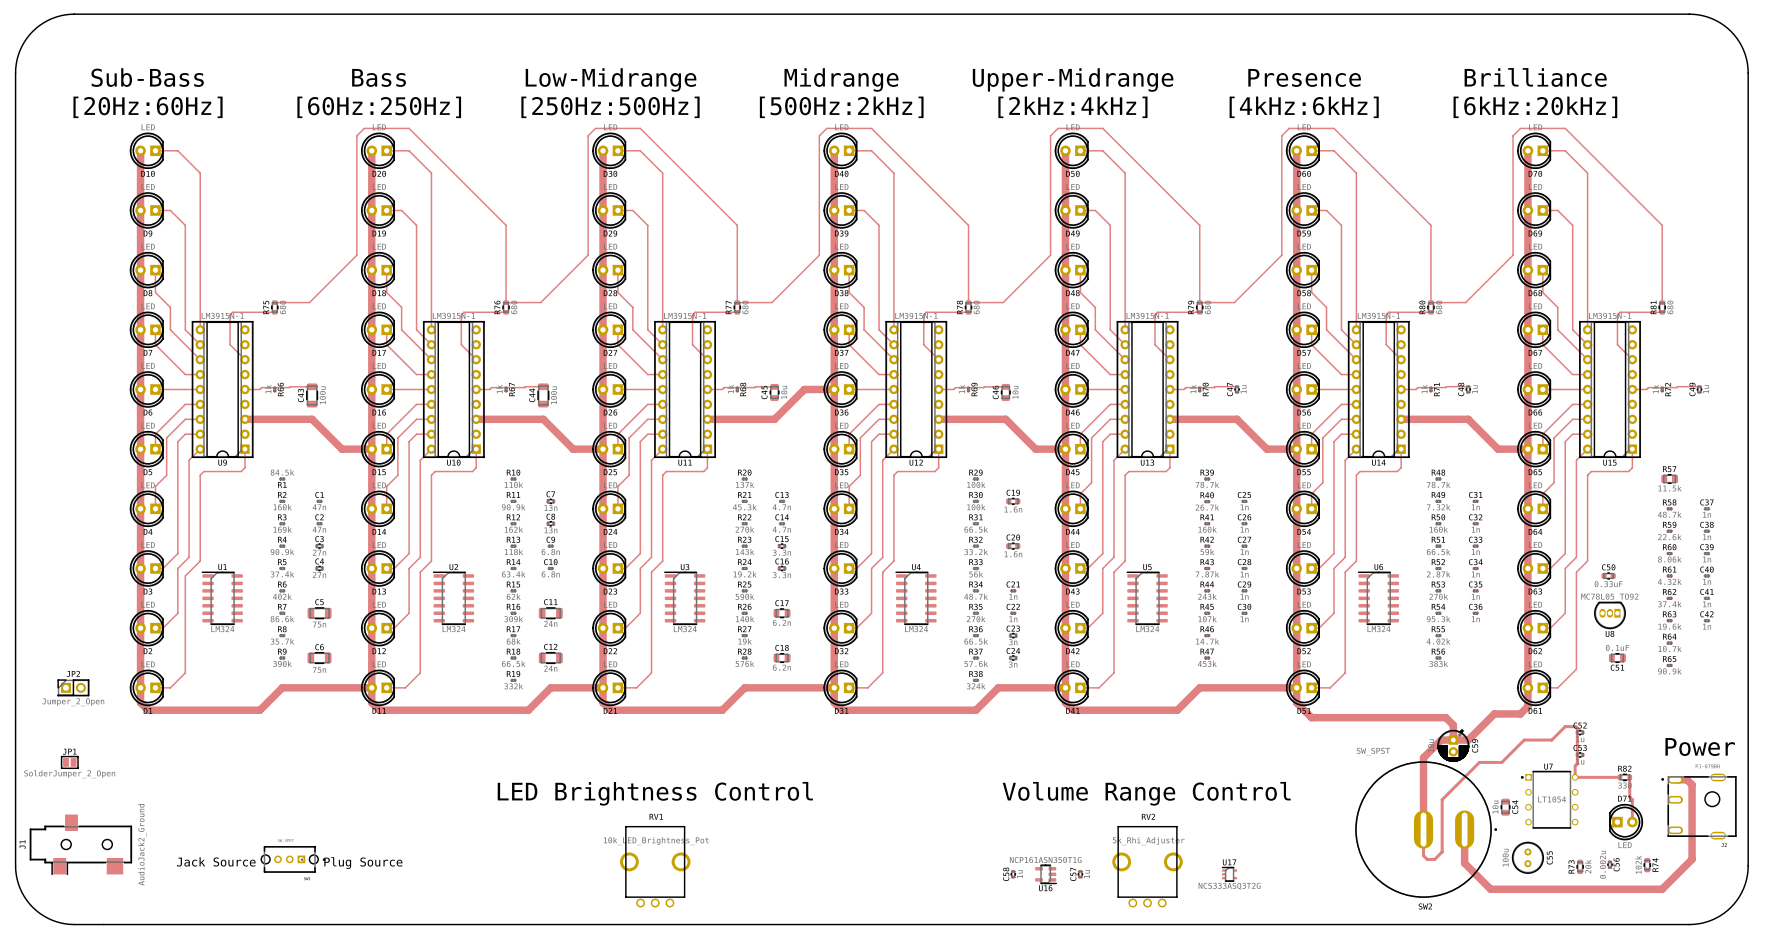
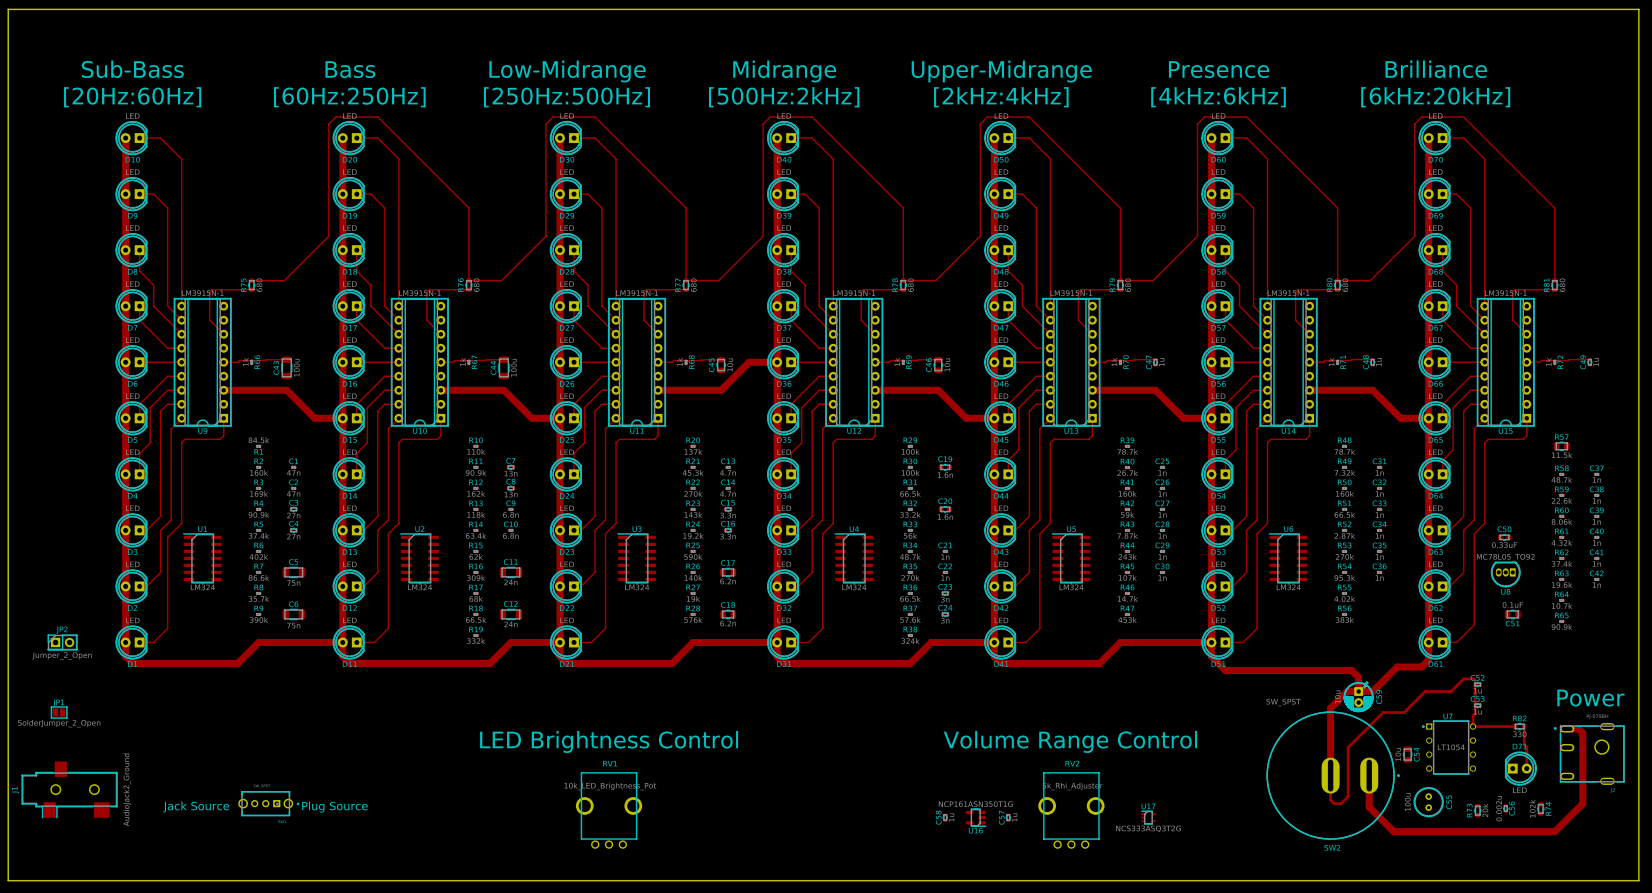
board edge: (15, 72) (20, 50) (32, 31) (51, 18) (74, 14) (1689, 14) (1711, 18) (1730, 31) (1743, 50) (1748, 72) (1748, 870) (1743, 888) (1736, 900) (1723, 913) (1711, 920) (1689, 924) (74, 924) (51, 920) (32, 907) (20, 888) (15, 865) -> (8, 64) (8, 9) (1638, 9) (1638, 880) (8, 880) (8, 809)

